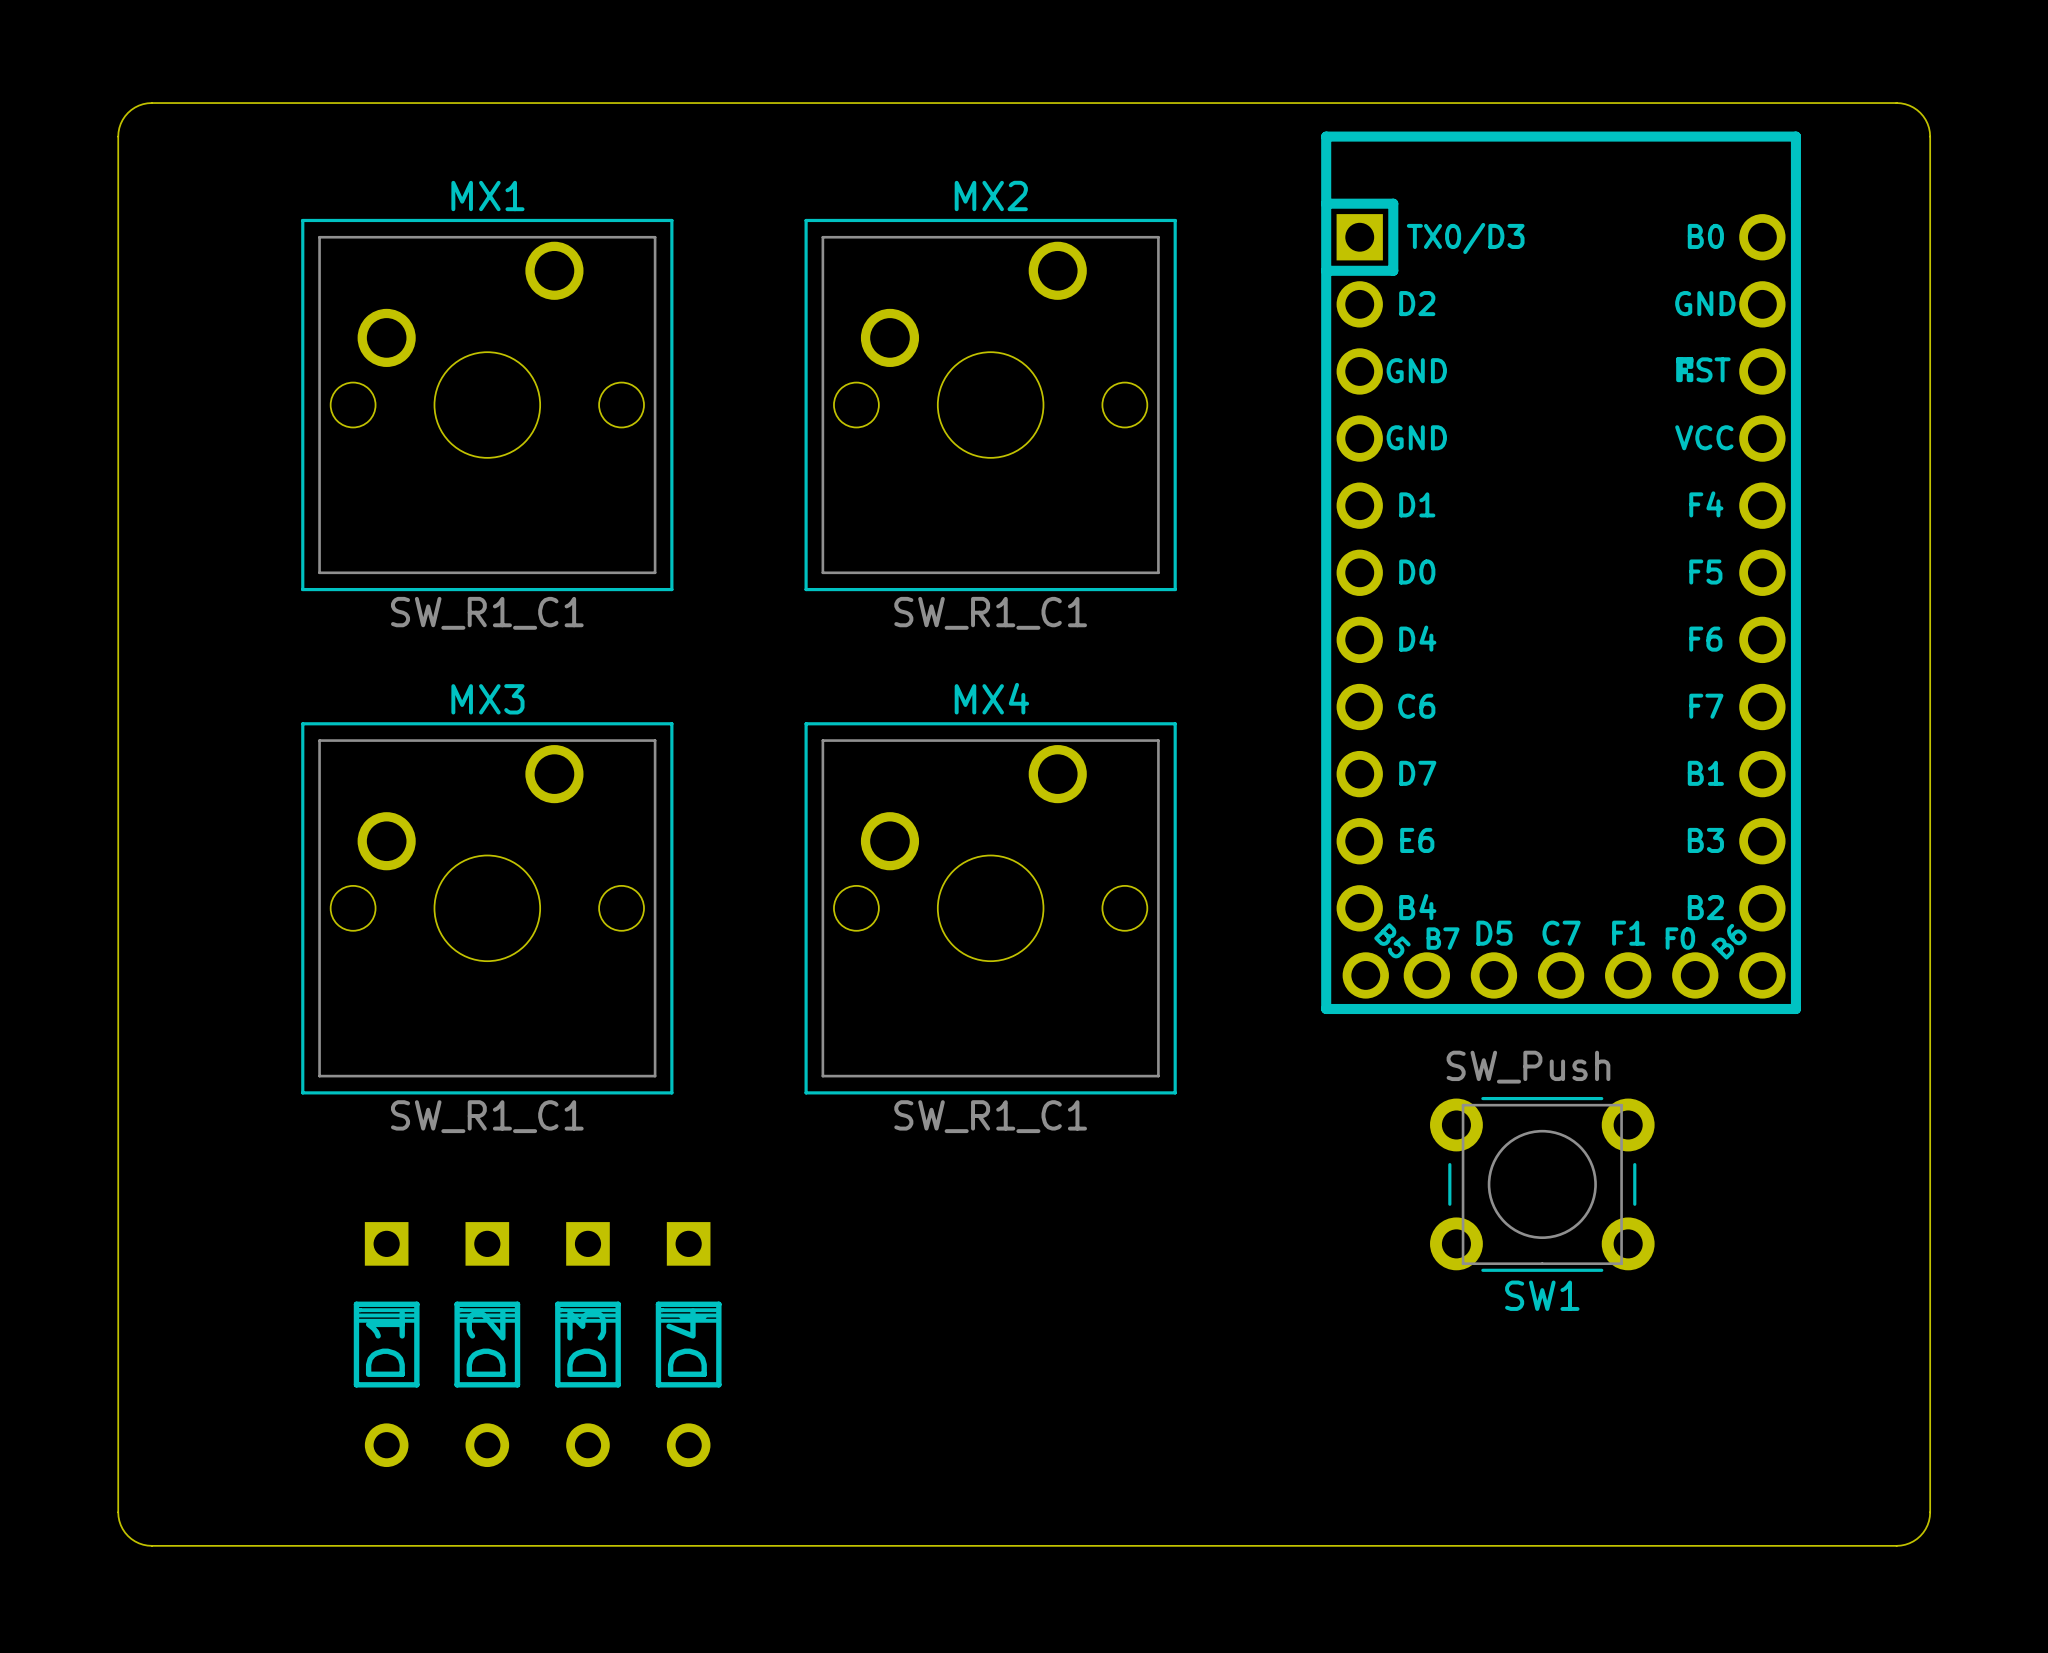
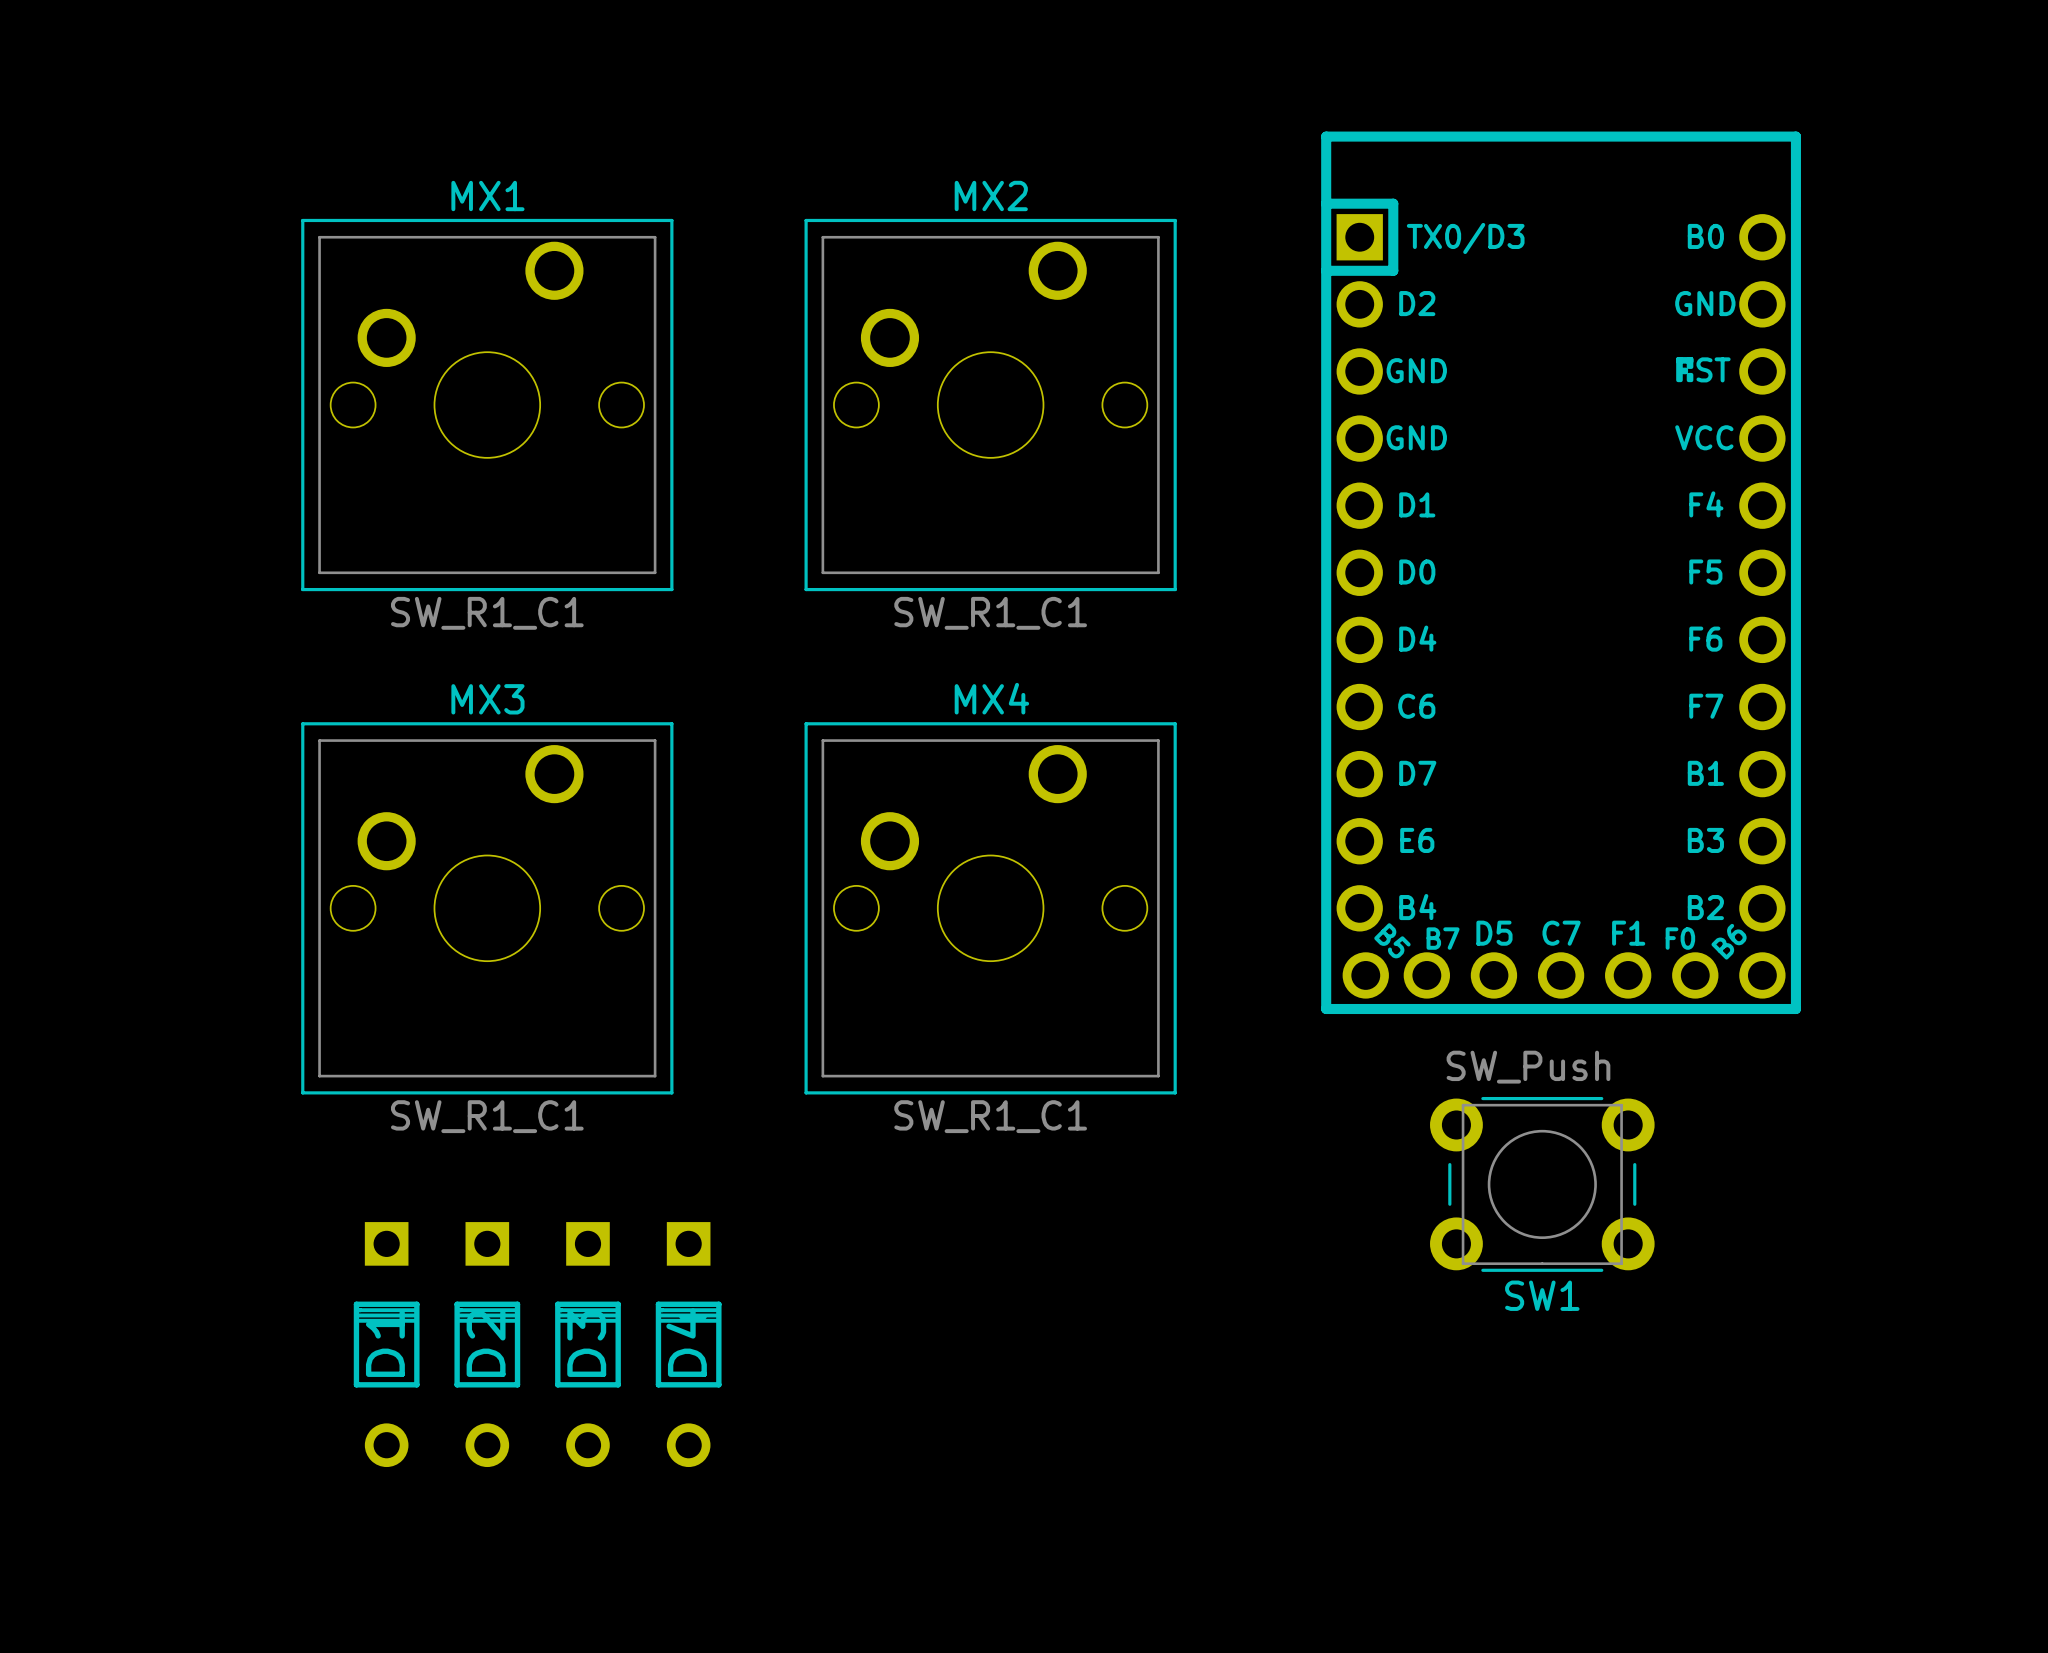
board edge: (151, 103) (1896, 103) (1905, 104) (1917, 109) (1925, 119) (1930, 136) (1930, 1512) (1929, 1521) (1923, 1532) (1913, 1541) (1896, 1545) (151, 1545) (143, 1544) (131, 1538) (122, 1529) (118, 1512) (118, 136) (120, 123) (128, 112) (138, 105) (151, 103) -> none

